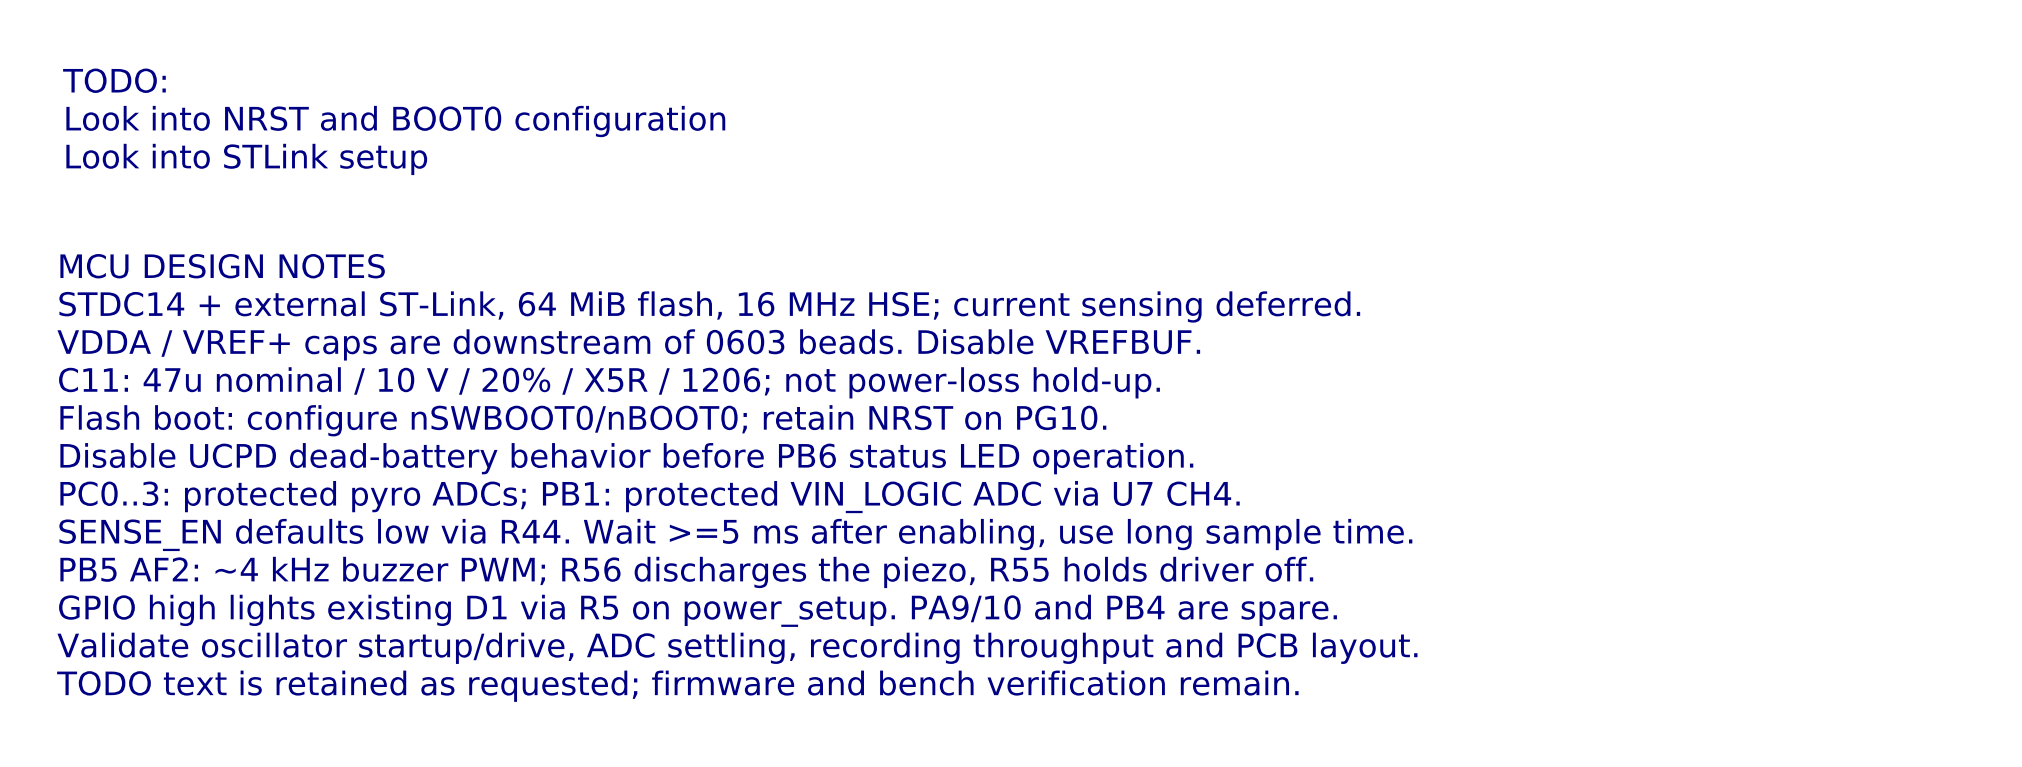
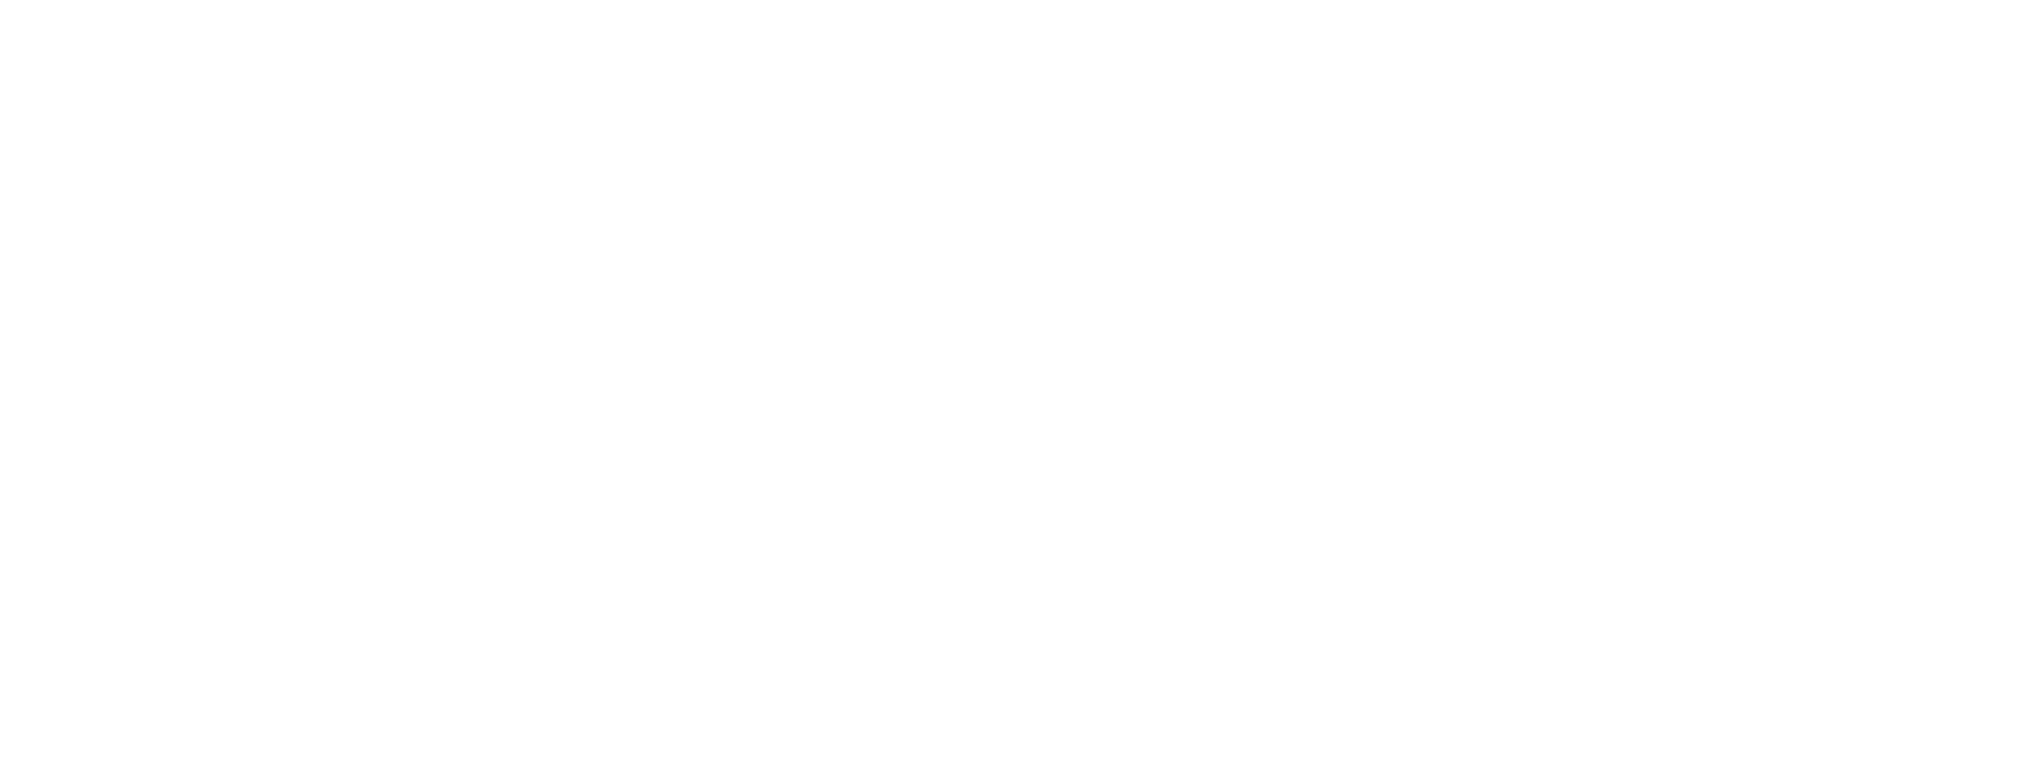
text: TODO: (114, 80) -> none
text: Look into NRST and BOOT0 configuration (395, 121) -> none
text: Look into STLink setup (246, 159) -> none
text: MCU DESIGN NOTES (222, 266) -> none
text: STDC14 + external ST-Link, 64 MiB flash, 16 MHz HSE; current sensing deferred. (709, 306) -> none
text: VDDA / VREF+ caps are downstream of 0603 beads. Disable VREFBUF. (628, 344) -> none
text: C11: 47u nominal / 10 V / 20% / X5R / 1206; not power-loss hold-up. (609, 382) -> none
text: Flash boot: configure nSWBOOT0/nBOOT0; retain NRST on PG10. (583, 420) -> none
text: Disable UCPD dead-battery behavior before PB6 status LED operation. (626, 458) -> none
text: PC0..3: protected pyro ADCs; PB1: protected VIN_LOGIC ADC via U7 CH4. (650, 497) -> none
text: SENSE_EN defaults low via R44. Wait >=5 ms after enabling, use long sample time. (735, 534) -> none
text: PB5 AF2: ~4 kHz buzzer PWM; R56 discharges the piezo, R55 holds driver off. (686, 572) -> none
text: GPIO high lights existing D1 via R5 on power_setup. PA9/10 and PB4 are spare. (697, 610) -> none
text: Validate oscillator startup/drive, ADC settling, recording throughput and PCB layout. (737, 648) -> none
text: TODO text is retained as requested; firmware and bench verification remain. (677, 686) -> none

